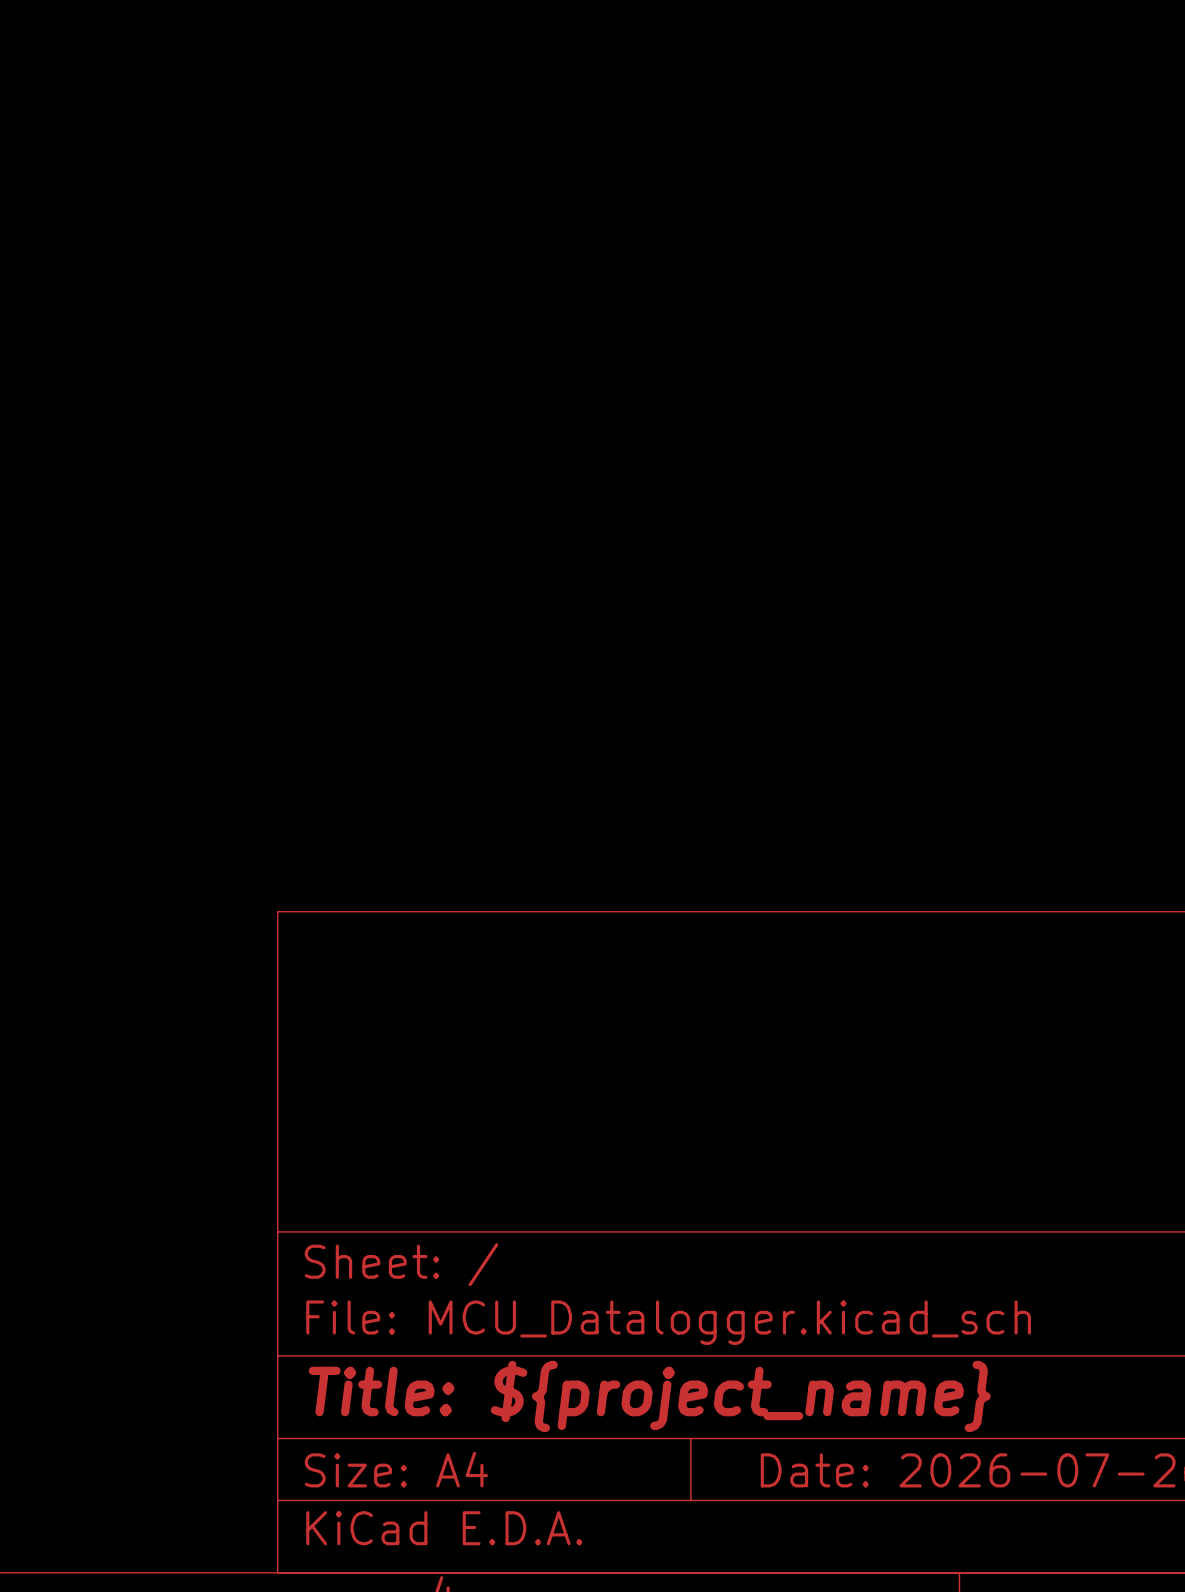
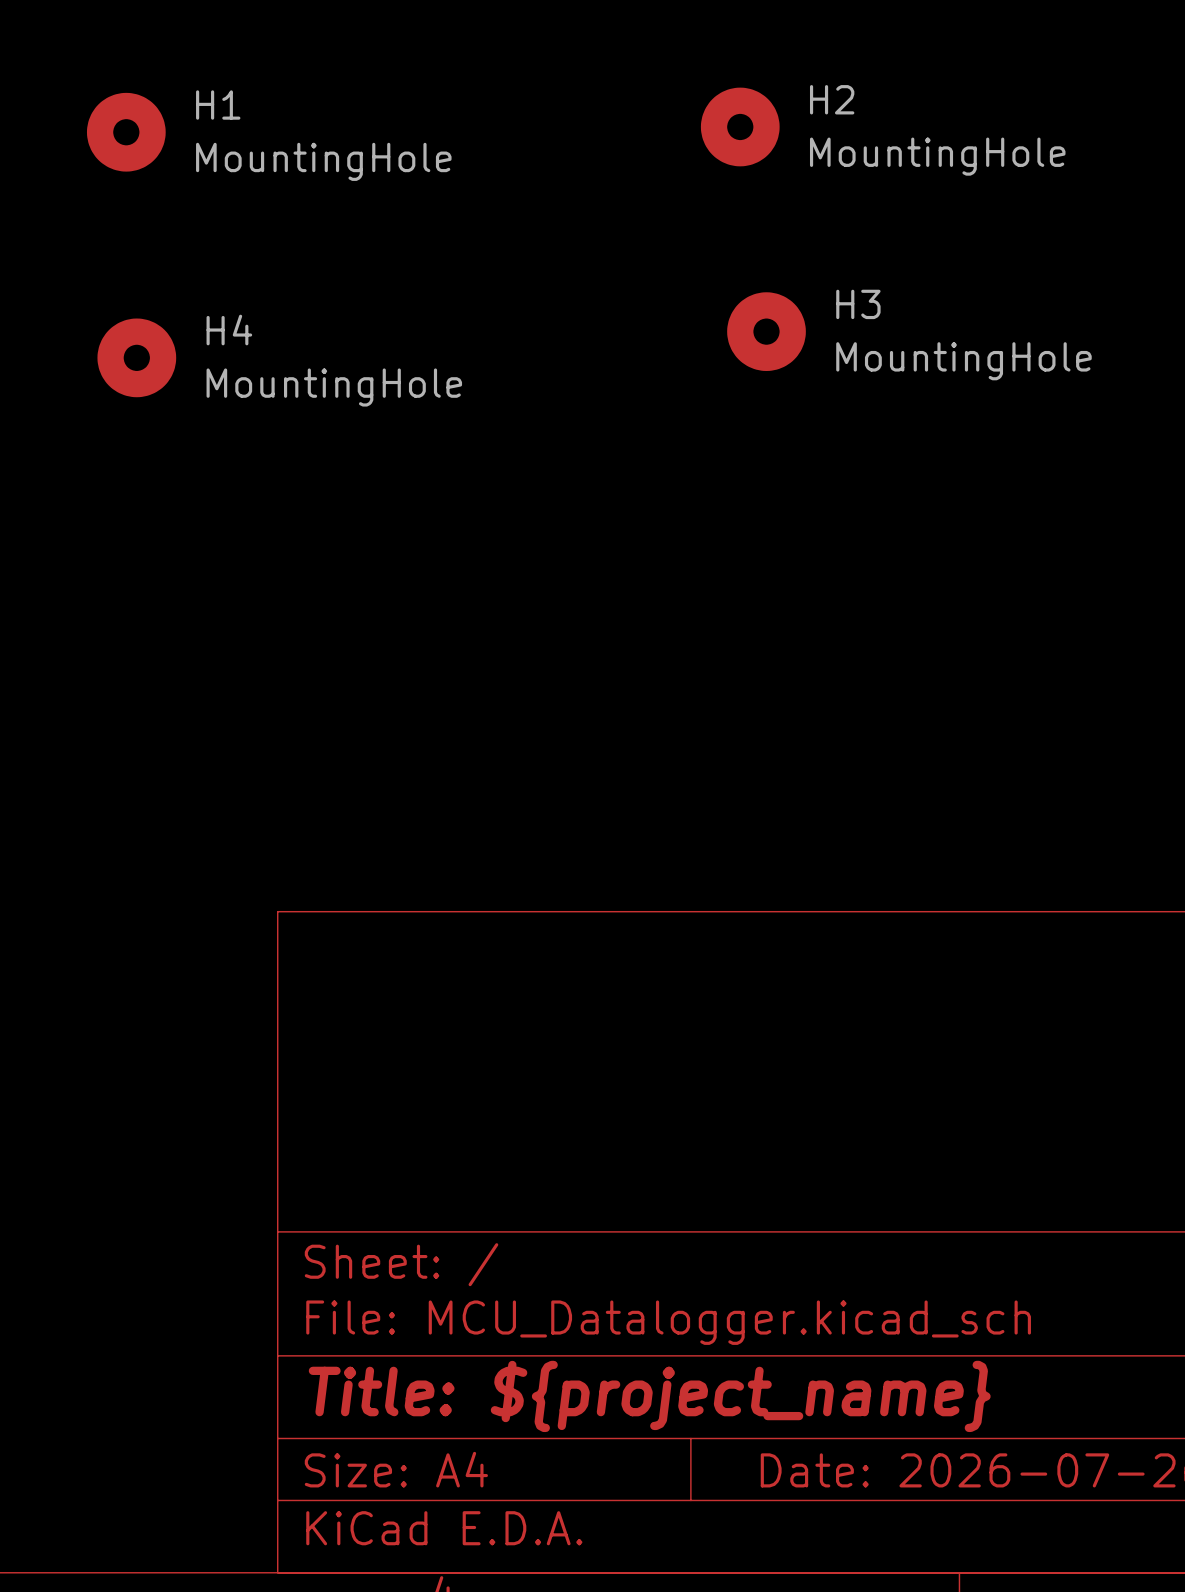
H2: none -> MountingHole (740, 126)
H1: none -> MountingHole (126, 132)
H3: none -> MountingHole (766, 331)
H4: none -> MountingHole (136, 357)

